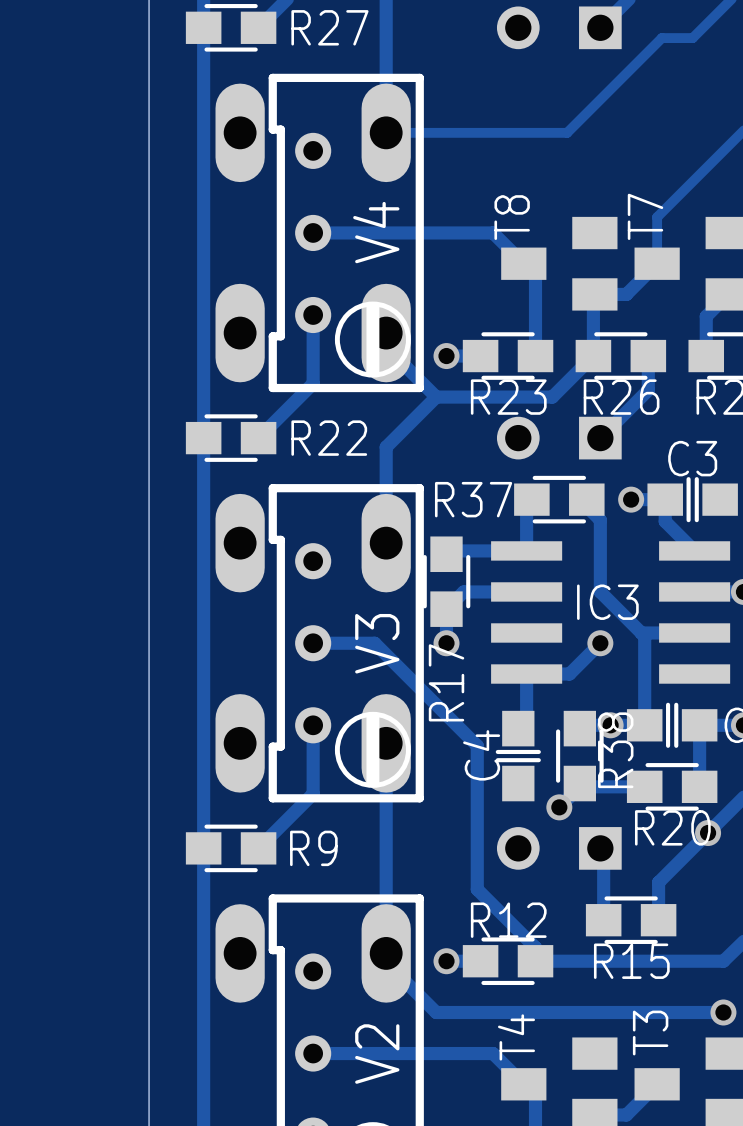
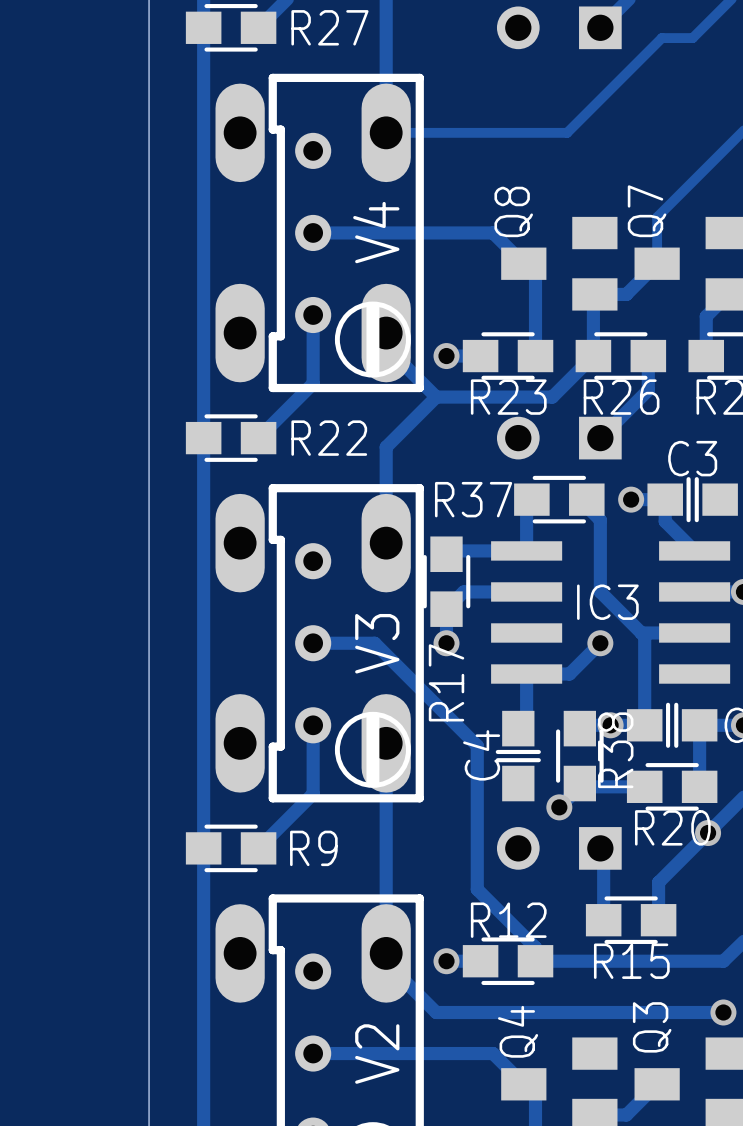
T7 name: T7 (645, 216) -> Q7 (647, 211)
T8 name: T8 (512, 217) -> Q8 (513, 211)
T3 name: T3 (650, 1033) -> Q3 (652, 1027)
T4 name: T4 (516, 1037) -> Q4 (518, 1031)

